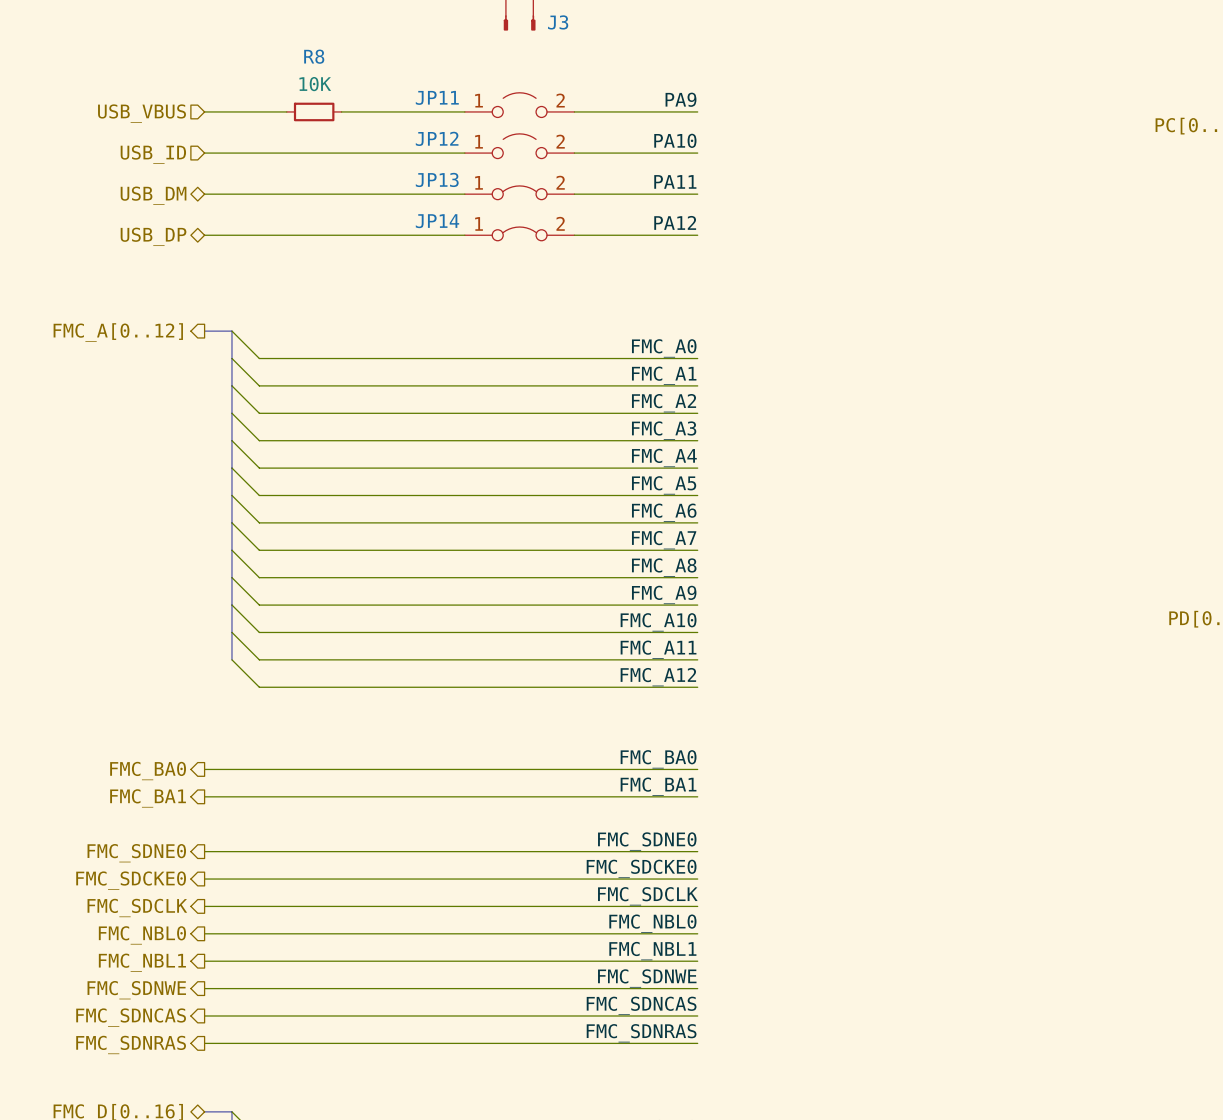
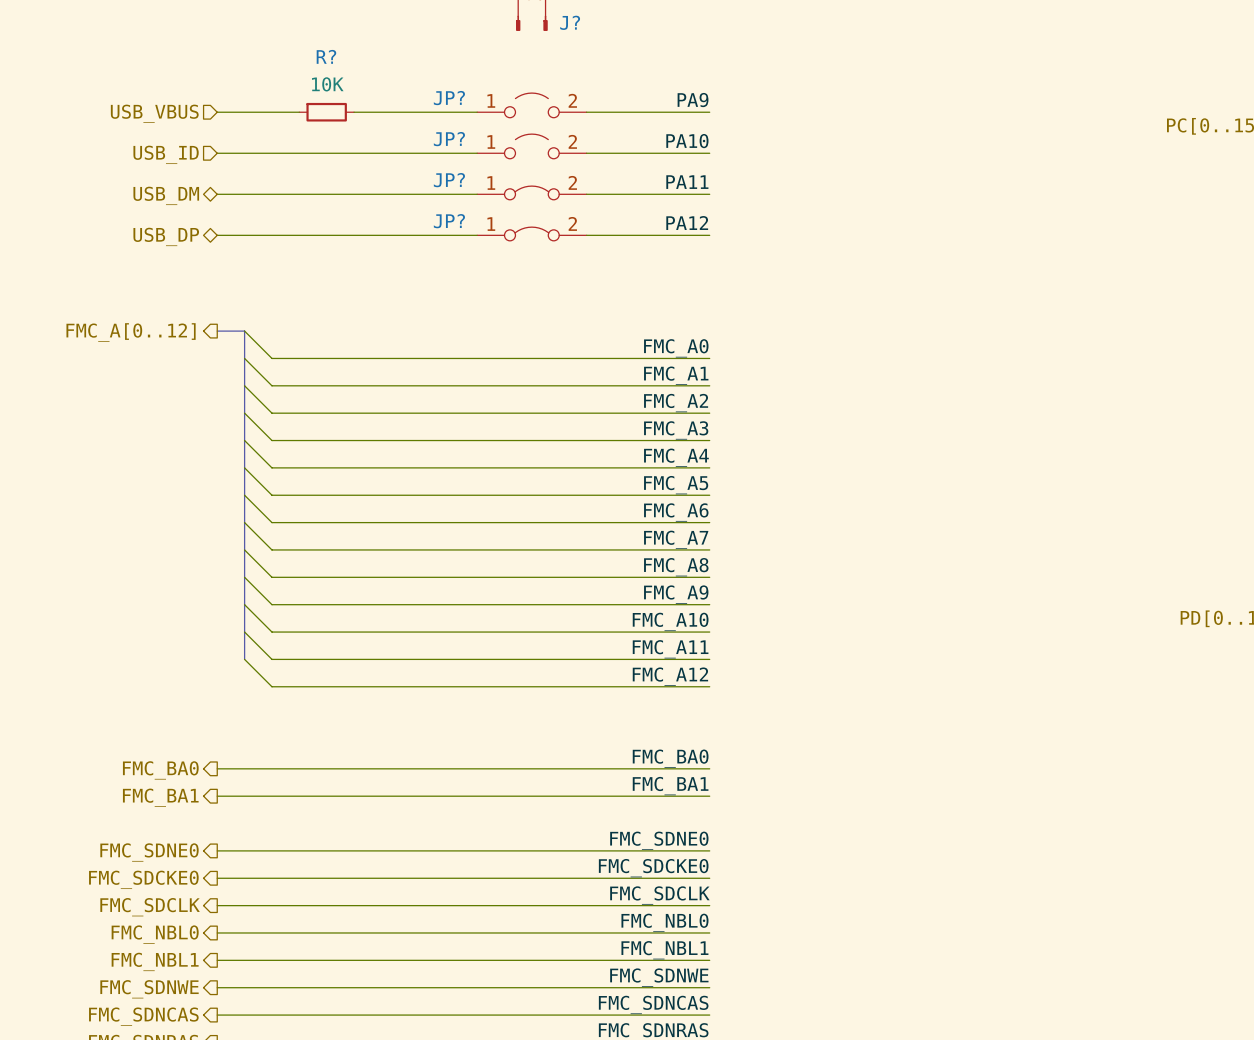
J3 name: J3 (558, 22) -> J? (570, 22)
R8 name: R8 (314, 56) -> R? (326, 56)
JP11 name: JP11 (437, 97) -> JP? (449, 98)
JP12 name: JP12 (437, 138) -> JP? (449, 139)
JP13 name: JP13 (437, 179) -> JP? (449, 180)
JP14 name: JP14 (437, 221) -> JP? (449, 221)

